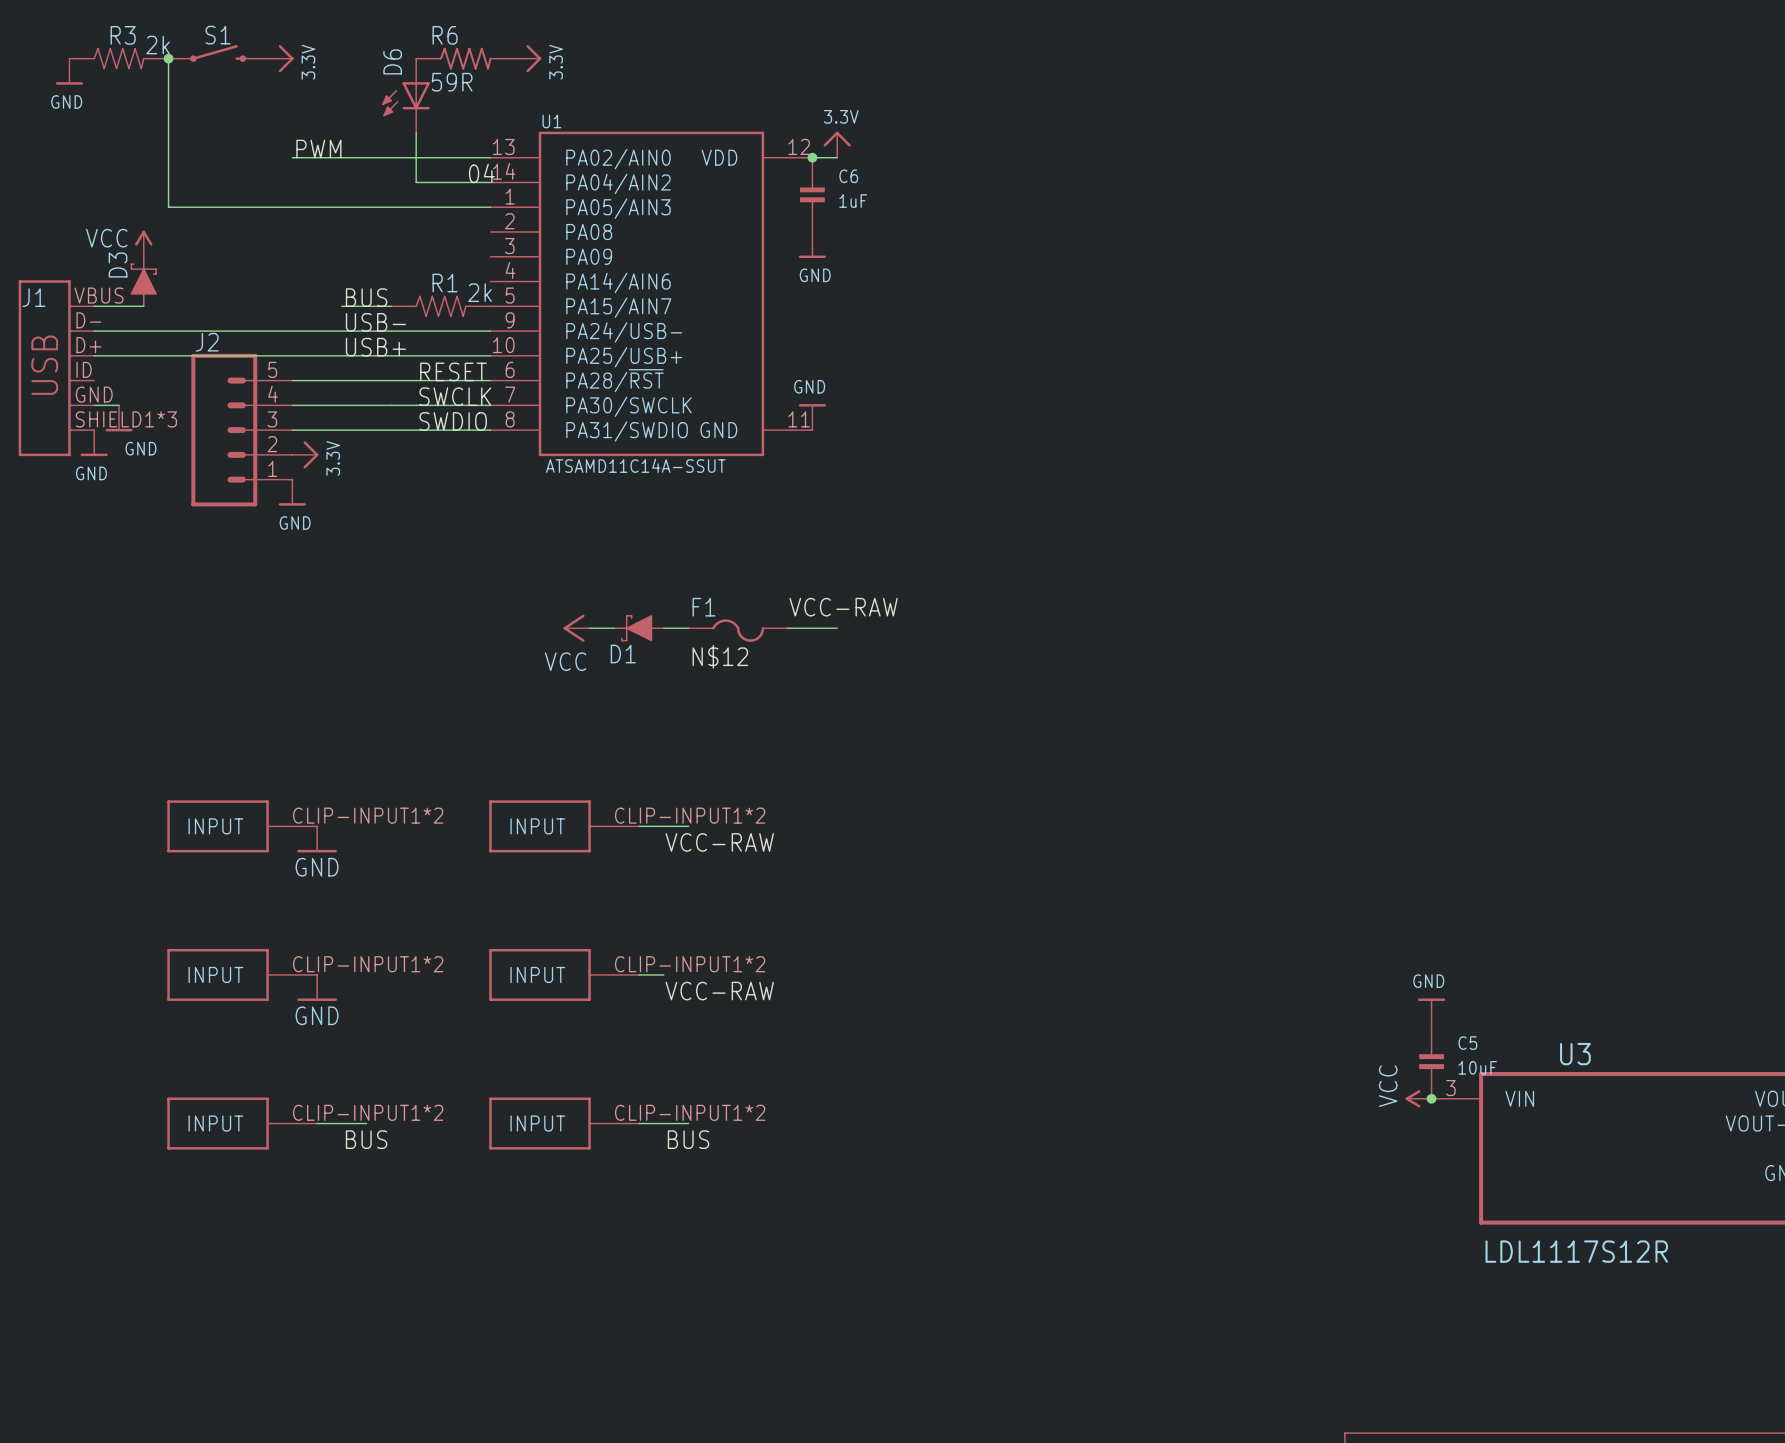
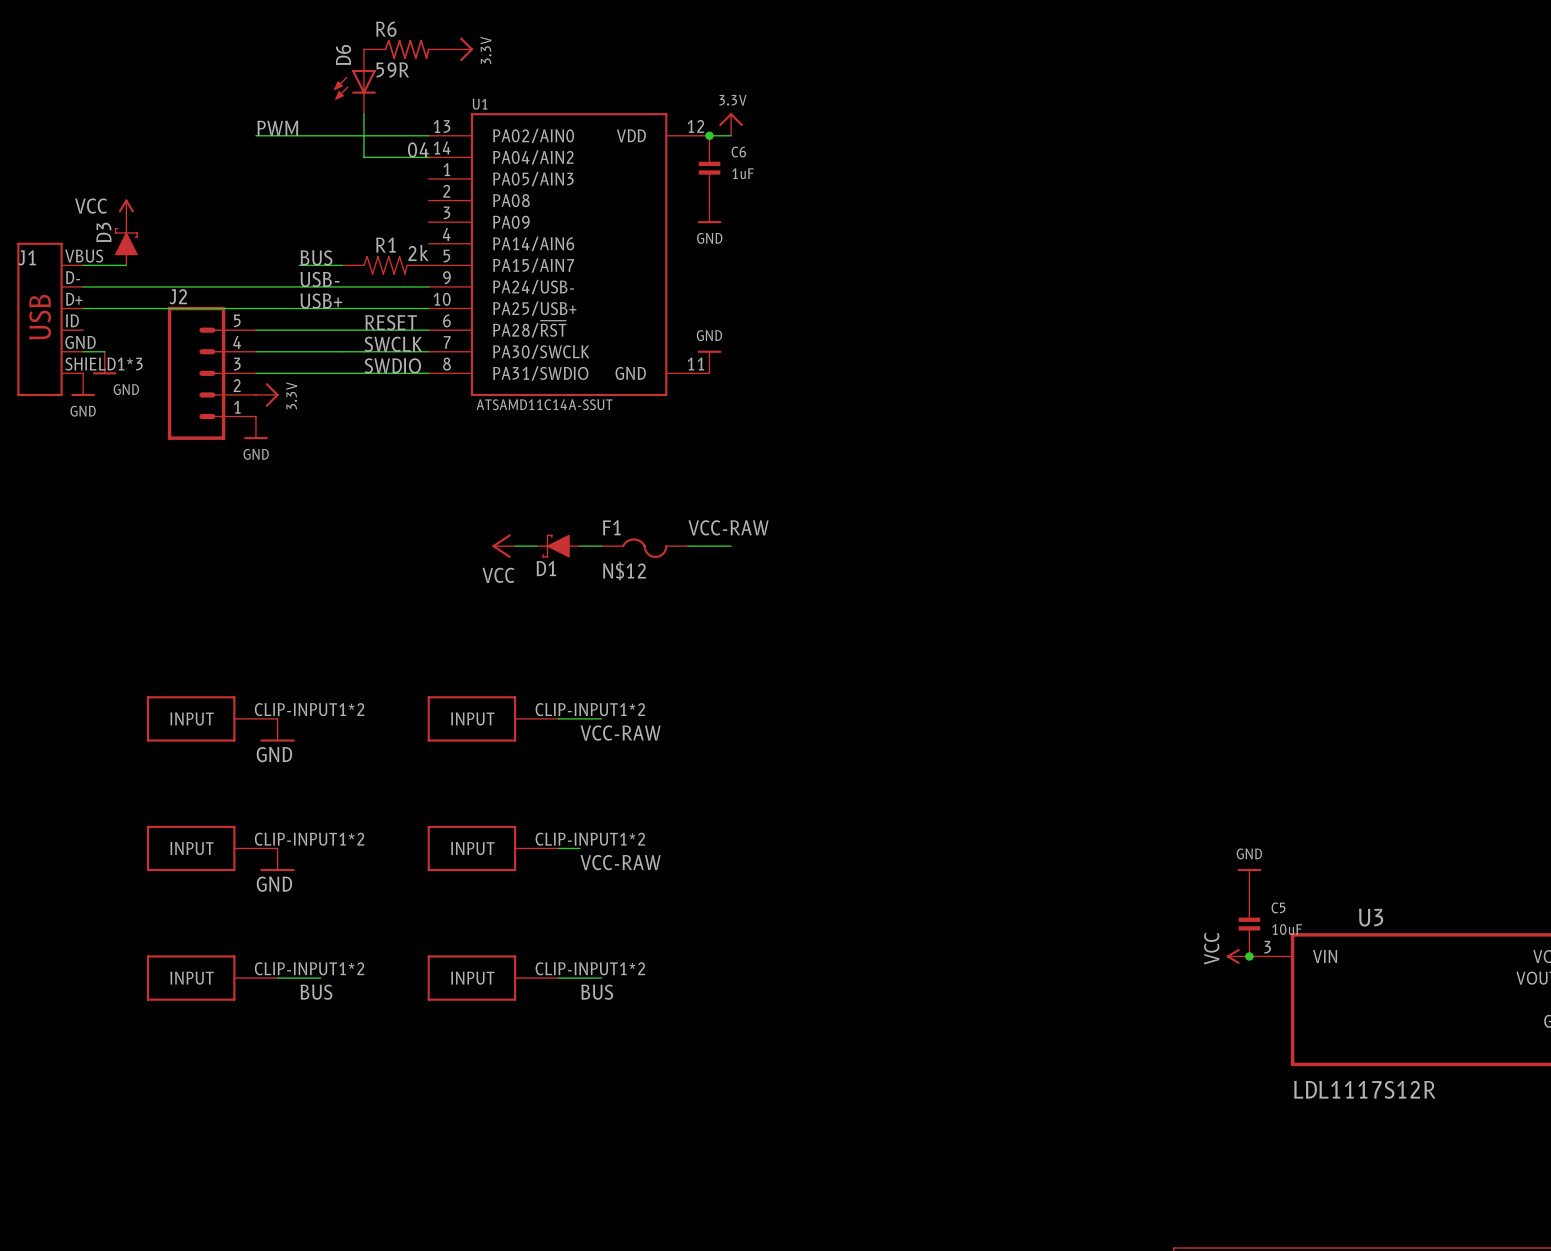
S1: (218, 53) -> none
R3: 2k (119, 58) -> none
wire: (168, 58) (168, 207) (490, 207) -> none
junction: (168, 58) -> none
power symbol: 3.3V (280, 58) -> none
power symbol: GND (69, 71) -> none

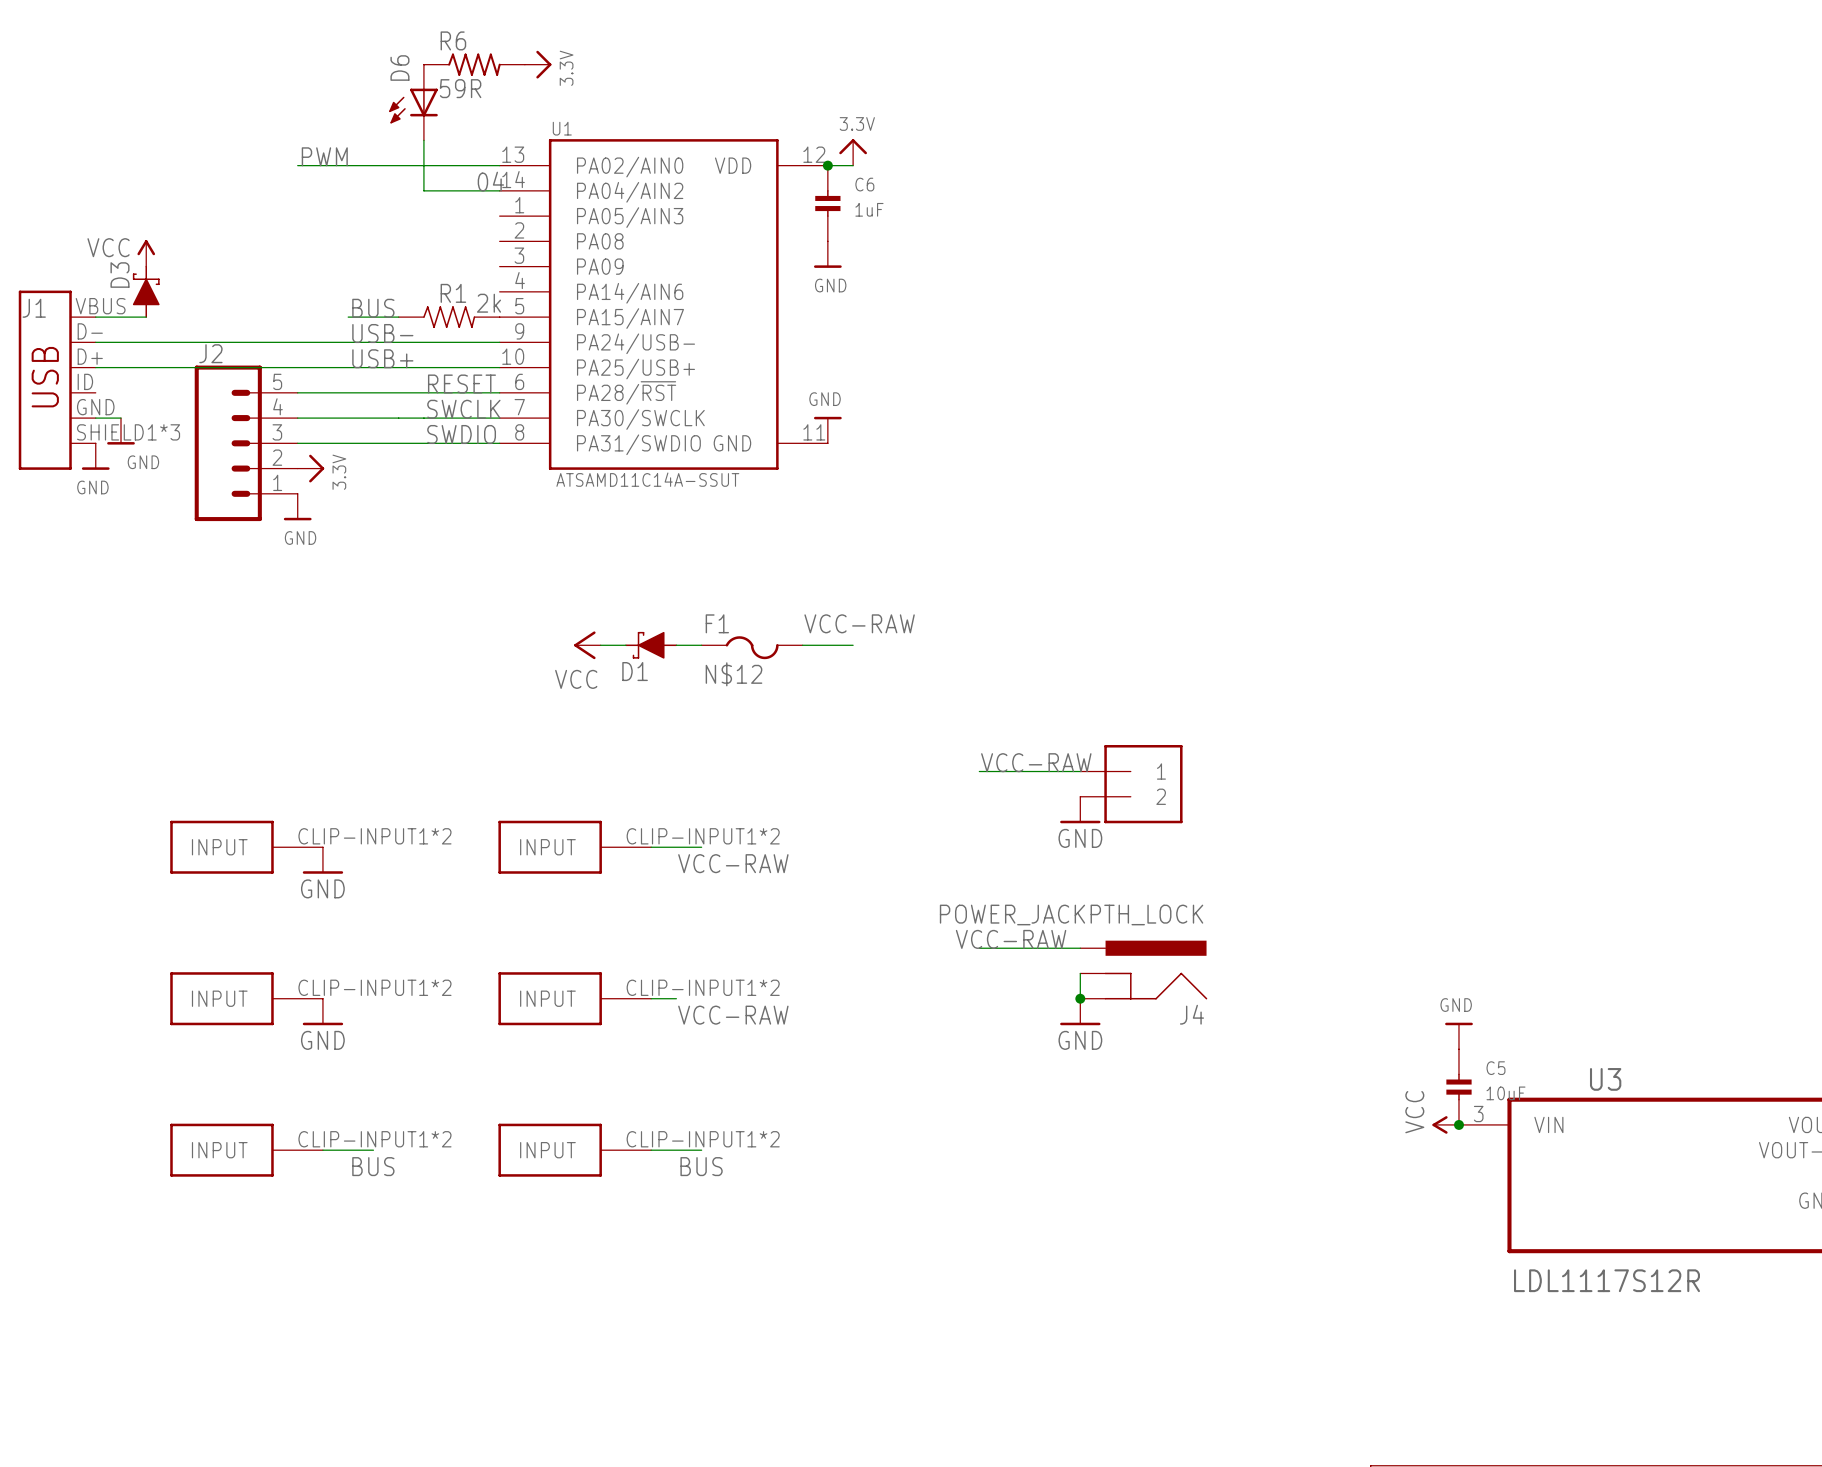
label: none -> VCC-RAW (1036, 762)
wire: none -> (979, 771) (1080, 771)
part: none -> (1131, 784)
power symbol: none -> GND (1080, 810)
label: none -> VCC-RAW (1011, 939)
wire: none -> (979, 948) (1080, 948)
J4: none -> POWER_JACKPTH_LOCK (1143, 970)
wire: none -> (1080, 973) (1080, 998)
junction: none -> (1080, 998)
power symbol: none -> GND (1080, 1011)

